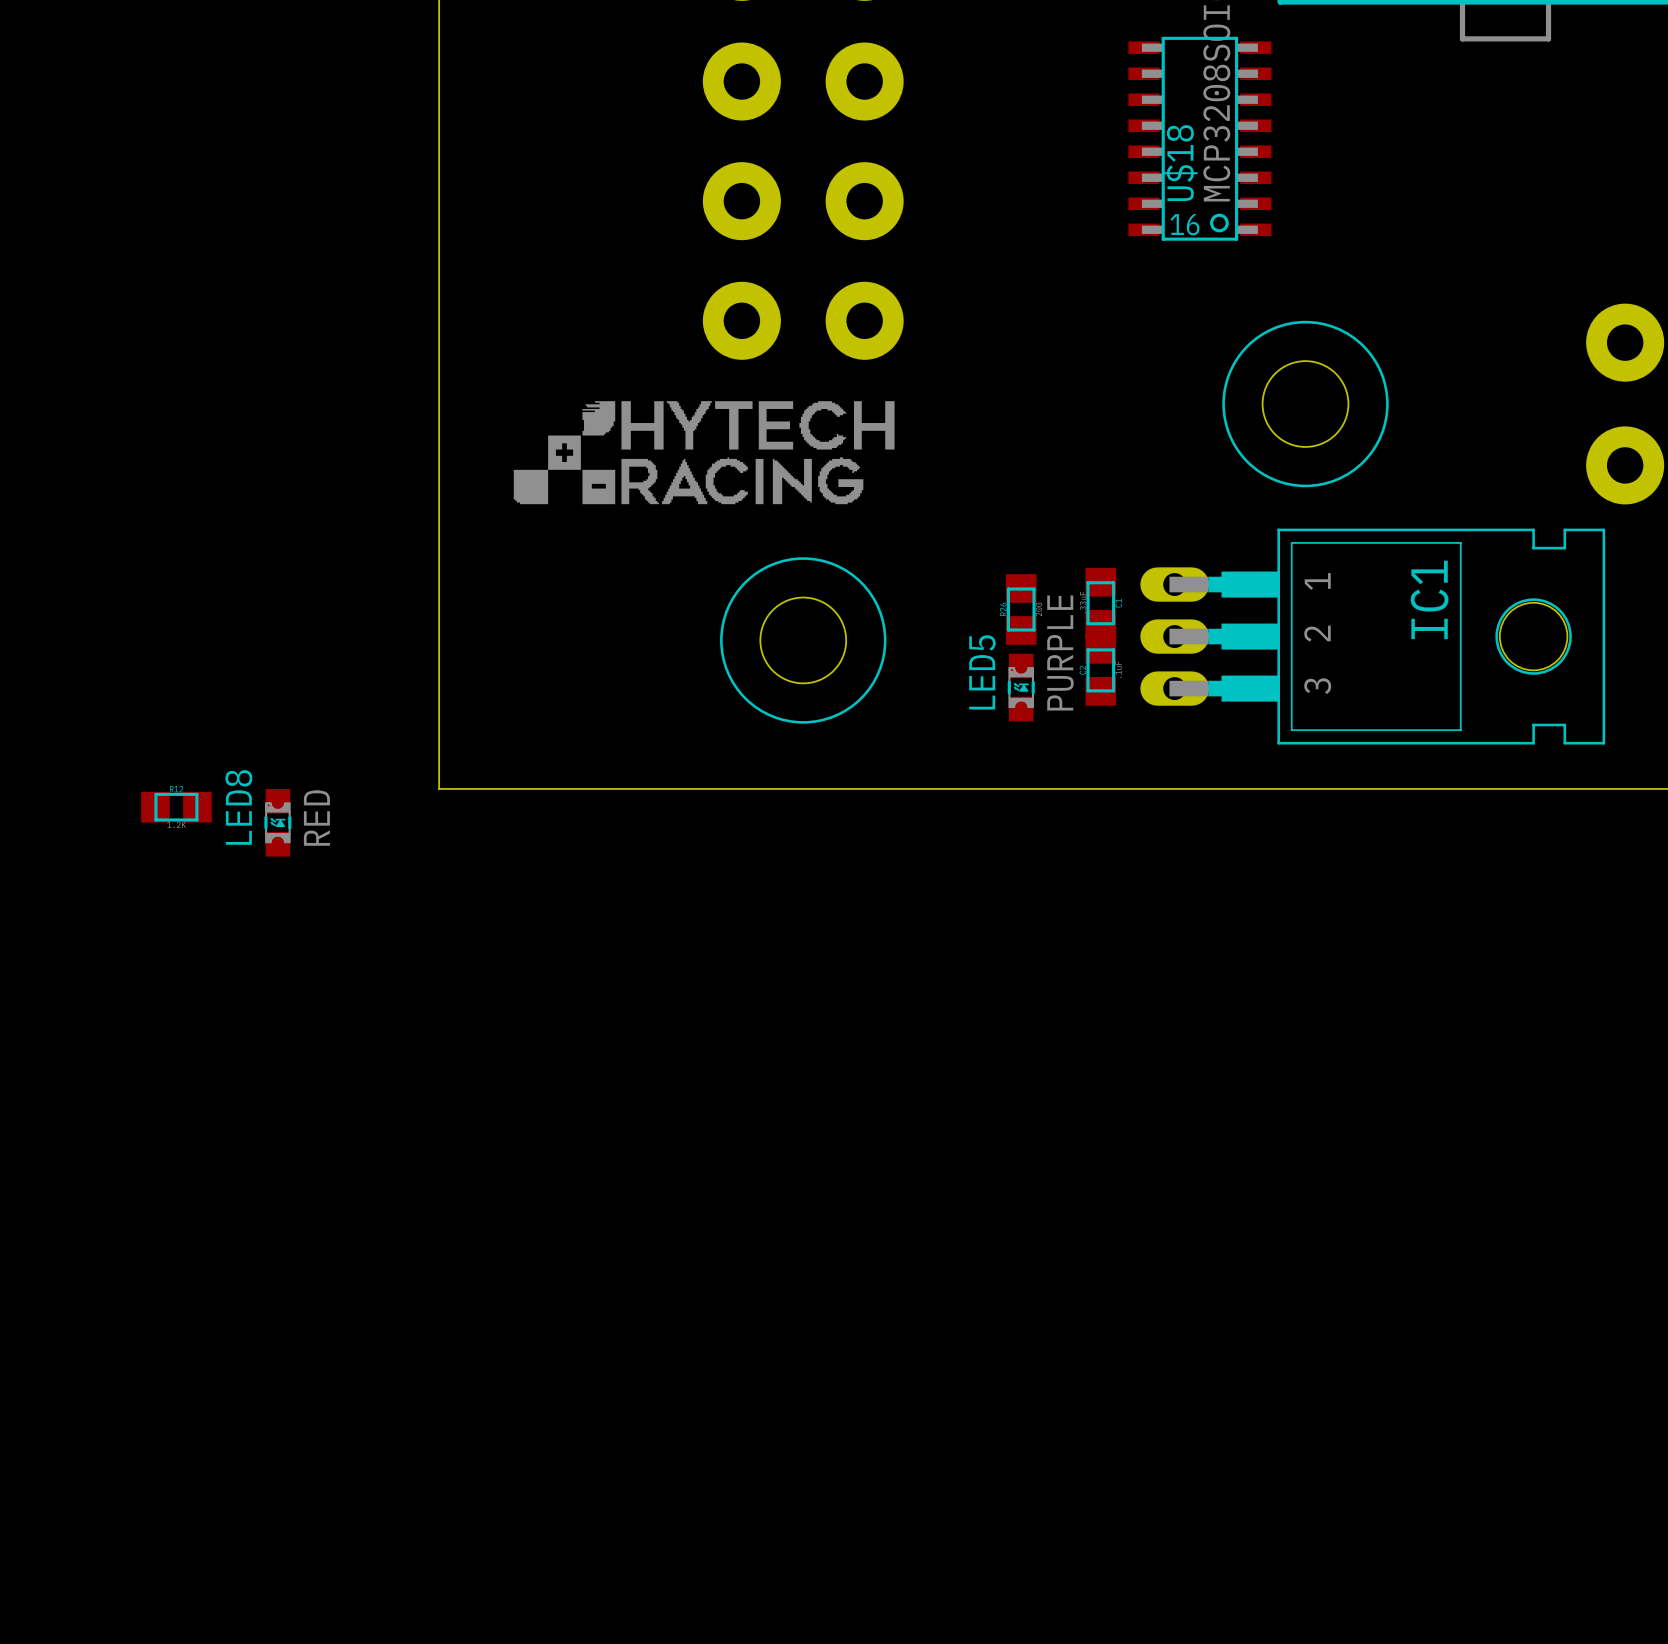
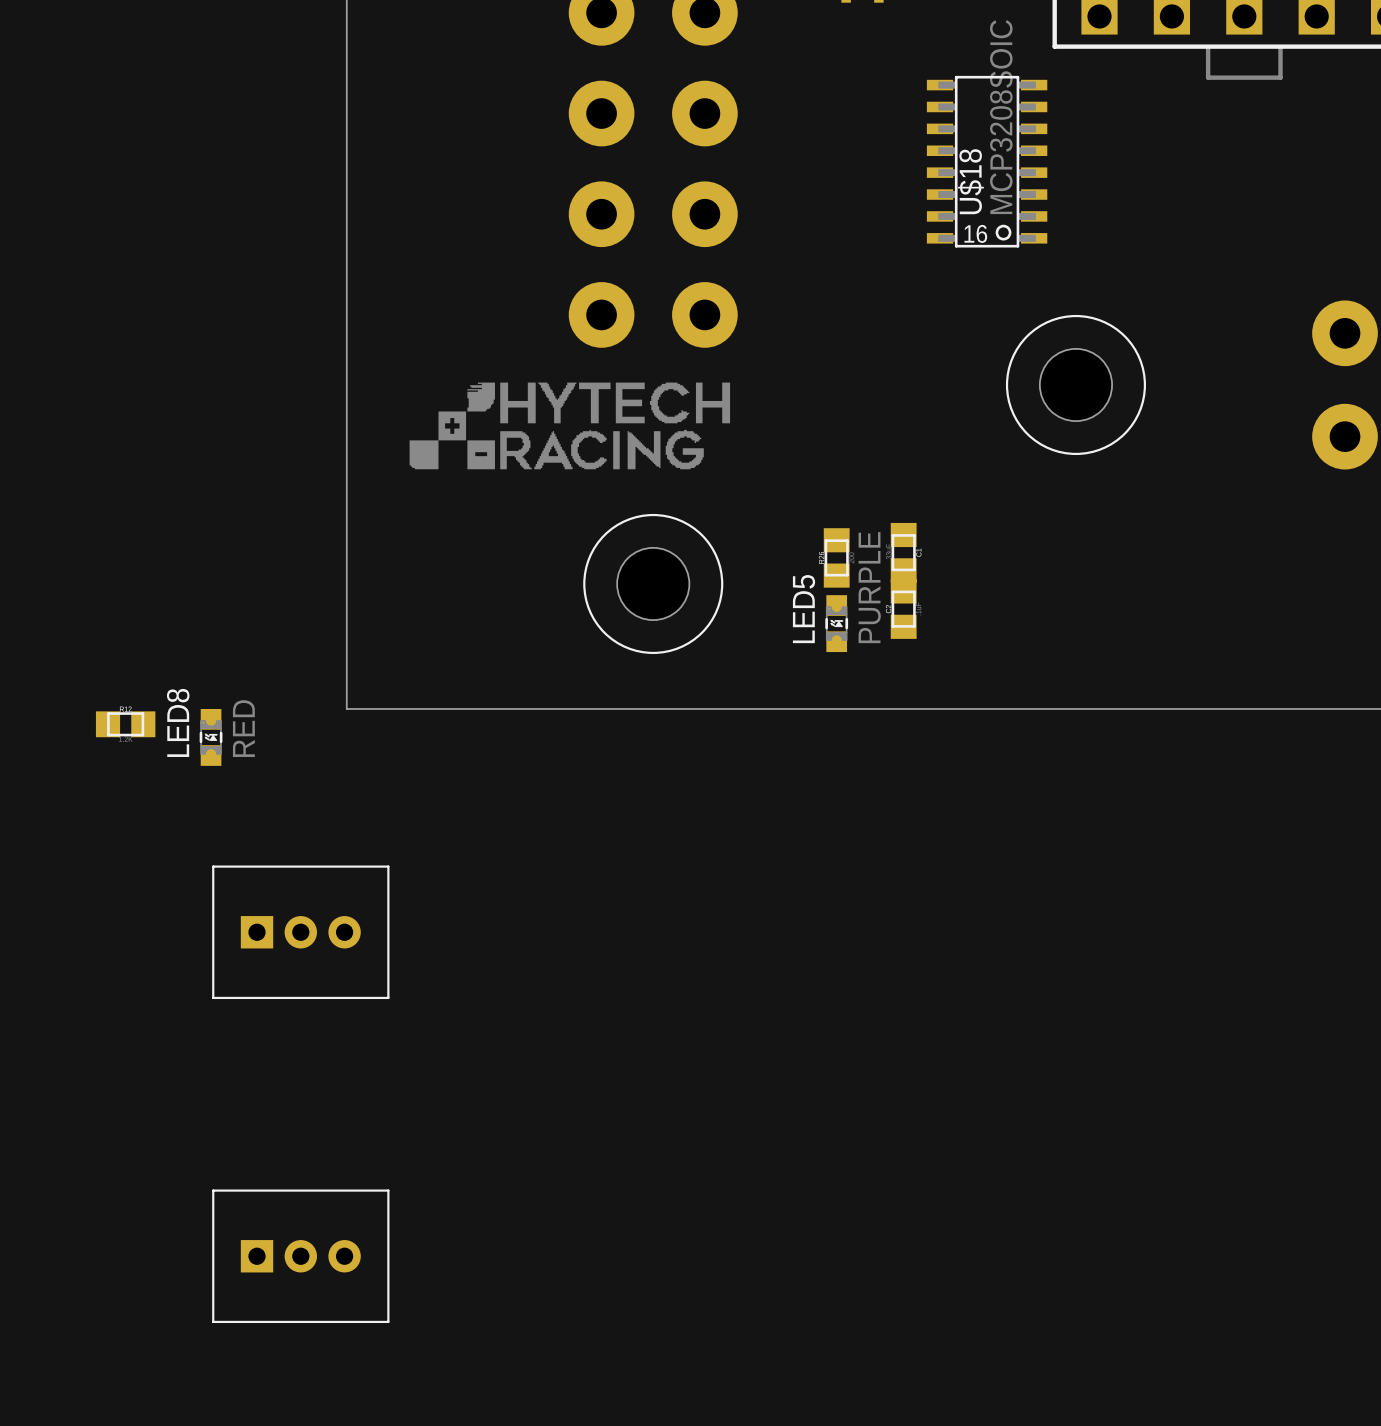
IC1: (1372, 636) -> none
part: none -> (300, 932)
part: none -> (300, 1256)

